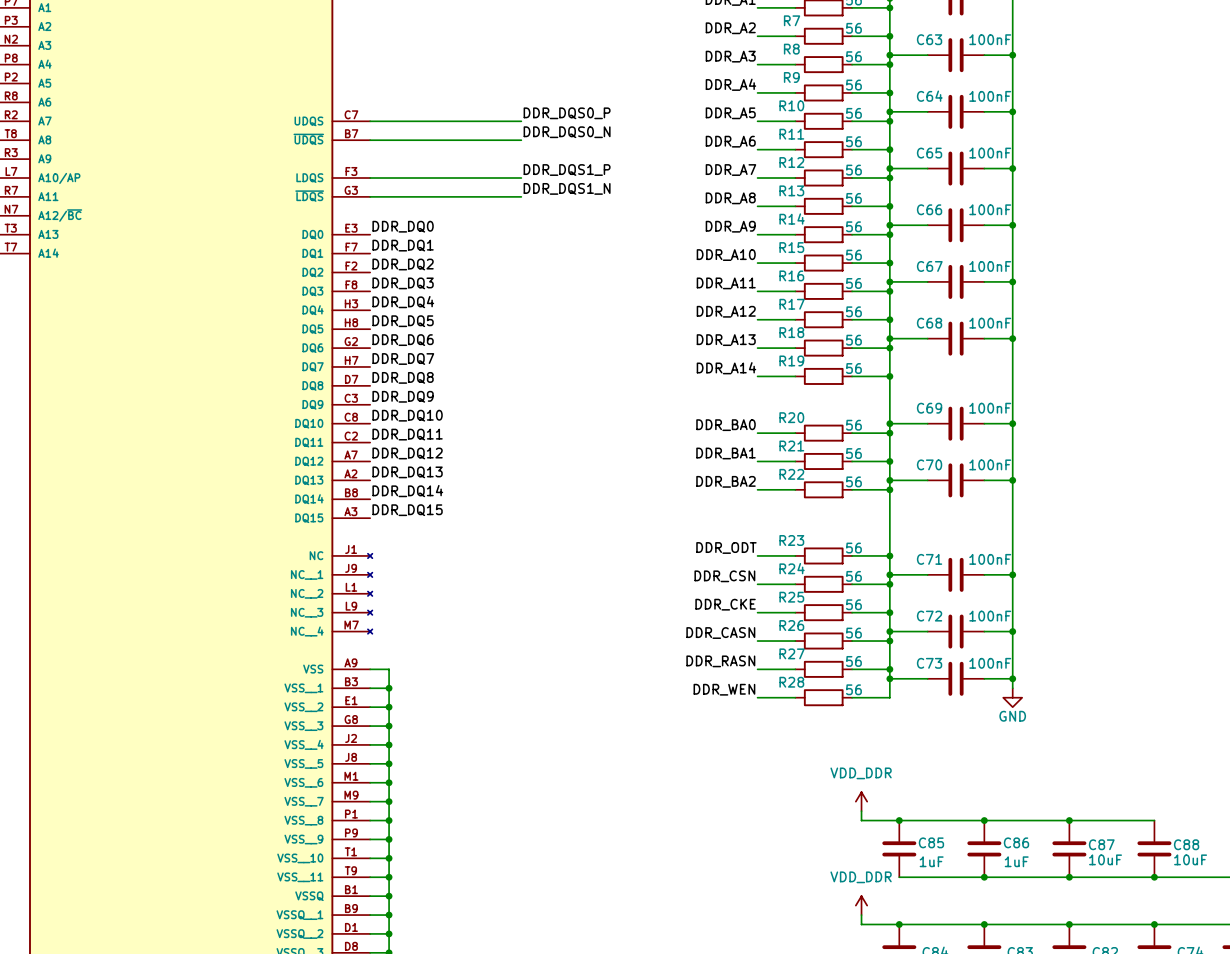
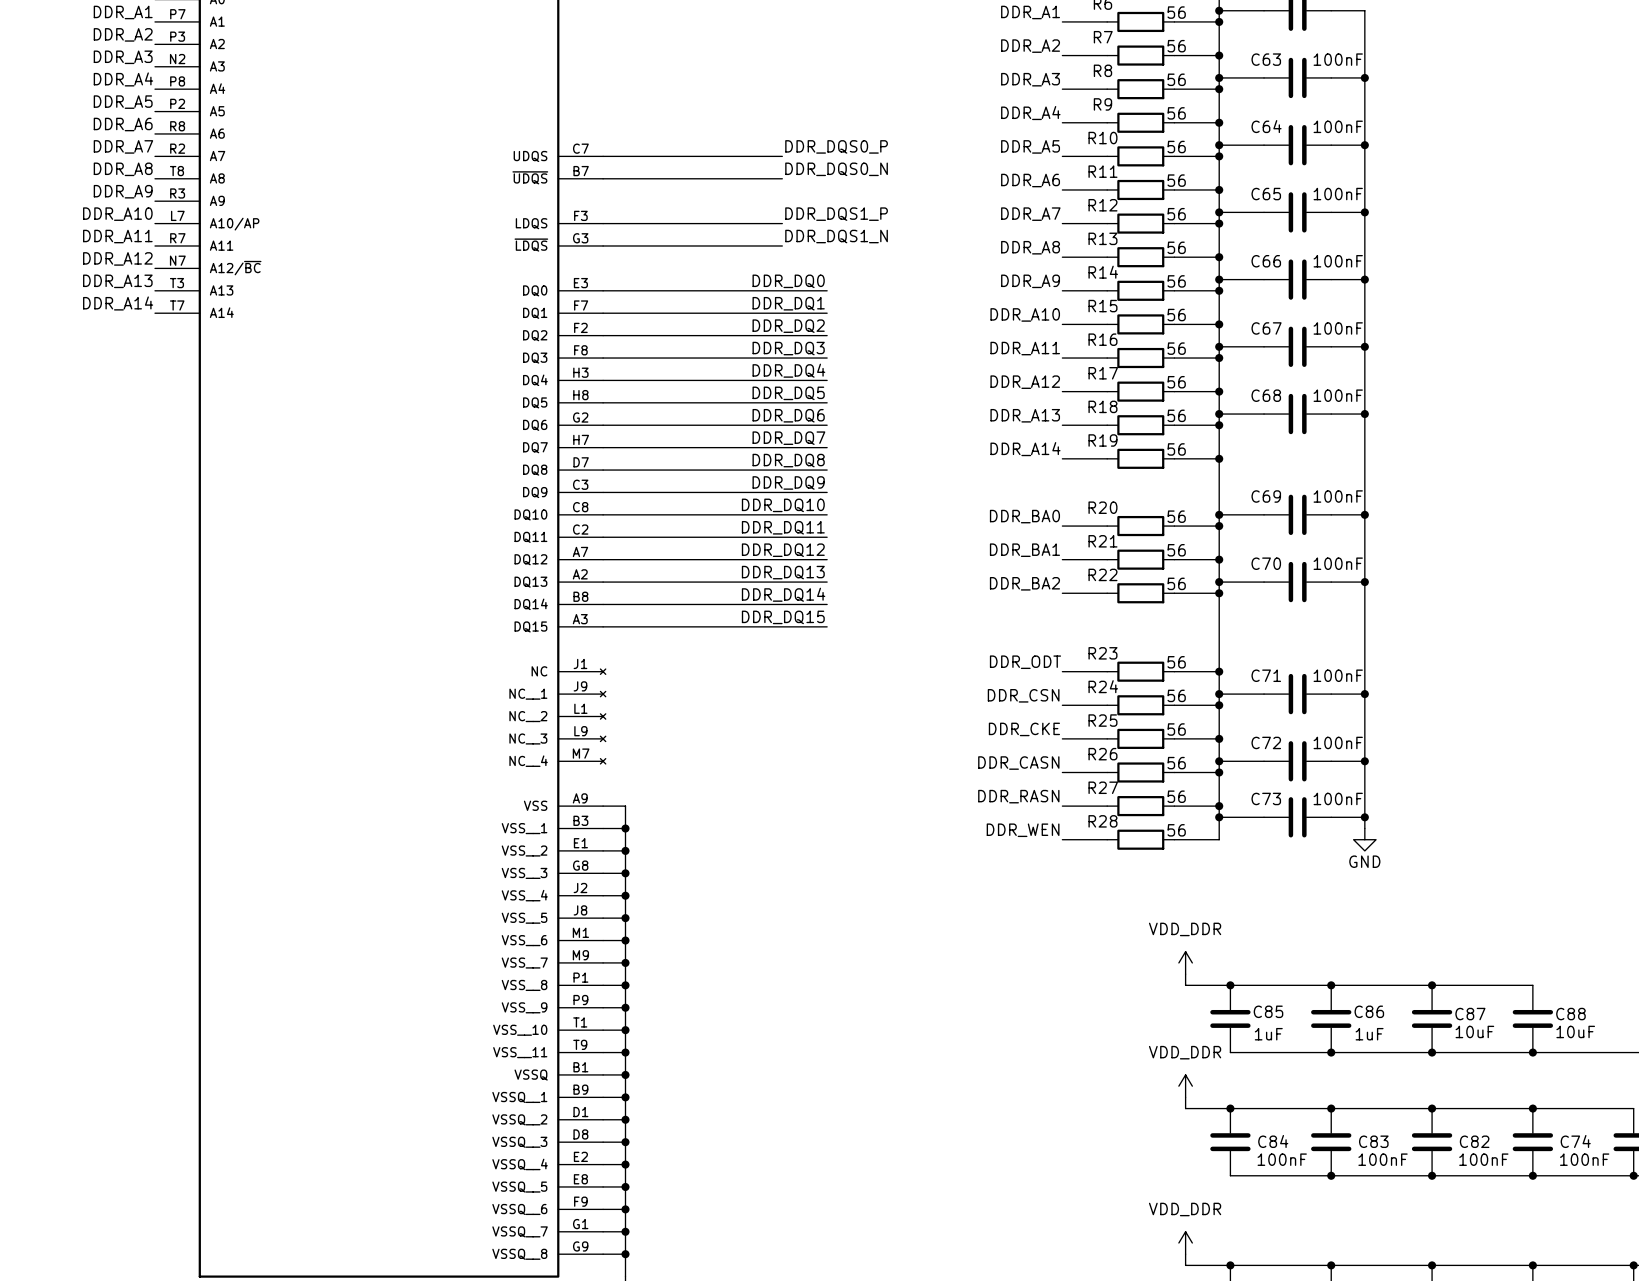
label: DDR_DQ0 (403, 226) -> none
label: none -> DDR_DQ0 (788, 281)
wire: none -> (603, 290) (827, 290)
label: DDR_DQ1 (403, 245) -> none
label: none -> DDR_DQ1 (788, 303)
wire: none -> (603, 313) (827, 313)
label: DDR_DQ2 (403, 264) -> none
label: none -> DDR_DQ2 (788, 326)
wire: none -> (603, 335) (827, 335)
label: DDR_DQ3 (403, 283) -> none
label: none -> DDR_DQ3 (788, 348)
wire: none -> (603, 358) (827, 358)
label: DDR_DQ4 (403, 302) -> none
label: none -> DDR_DQ4 (788, 370)
wire: none -> (603, 380) (827, 380)
label: DDR_DQ5 (403, 321) -> none
label: none -> DDR_DQ5 (788, 393)
wire: none -> (603, 402) (827, 402)
label: DDR_DQ6 (403, 340) -> none
label: none -> DDR_DQ6 (788, 415)
wire: none -> (603, 425) (827, 425)
label: DDR_DQ7 (403, 359) -> none
label: none -> DDR_DQ7 (788, 438)
wire: none -> (603, 447) (827, 447)
label: DDR_DQ8 (403, 377) -> none
label: none -> DDR_DQ8 (788, 460)
wire: none -> (603, 470) (827, 470)
label: DDR_DQ9 (403, 396) -> none
label: none -> DDR_DQ9 (788, 482)
wire: none -> (603, 492) (827, 492)
label: DDR_DQ10 (407, 415) -> none
label: none -> DDR_DQ10 (783, 505)
wire: none -> (603, 514) (827, 514)
label: DDR_DQ11 (407, 434) -> none
label: none -> DDR_DQ11 (783, 527)
wire: none -> (603, 537) (827, 537)
label: DDR_DQ12 (407, 453) -> none
label: none -> DDR_DQ12 (783, 550)
wire: none -> (603, 559) (827, 559)
label: DDR_DQ13 (407, 472) -> none
label: none -> DDR_DQ13 (783, 572)
wire: none -> (603, 582) (827, 582)
label: DDR_DQ14 (407, 491) -> none
label: none -> DDR_DQ14 (783, 594)
wire: none -> (603, 604) (827, 604)
label: DDR_DQ15 (407, 510) -> none
label: none -> DDR_DQ15 (783, 617)
wire: none -> (603, 626) (827, 626)

